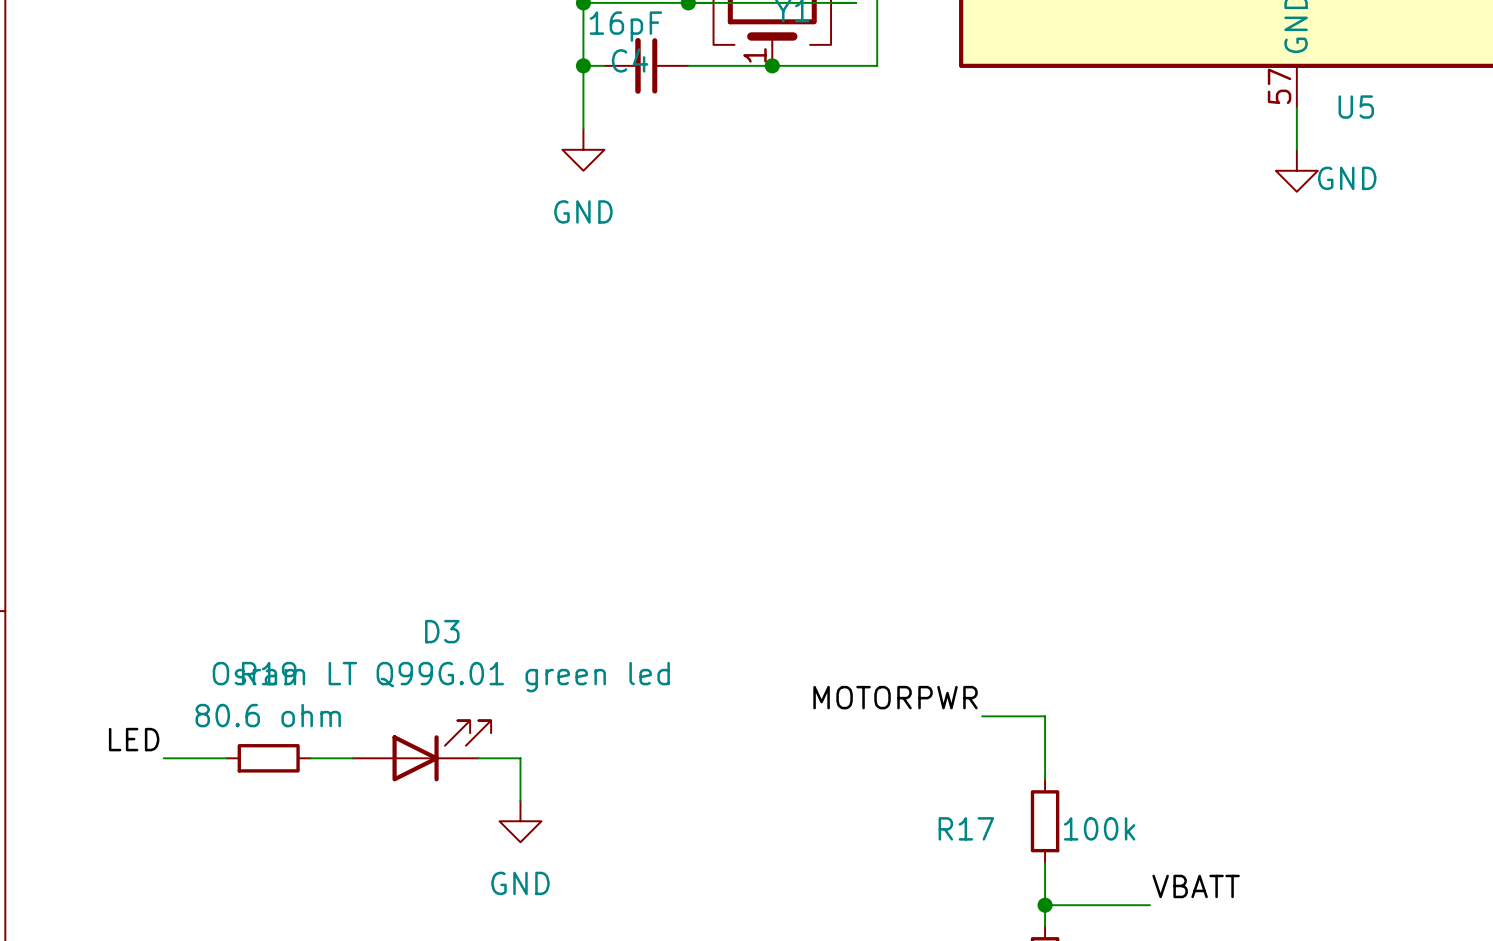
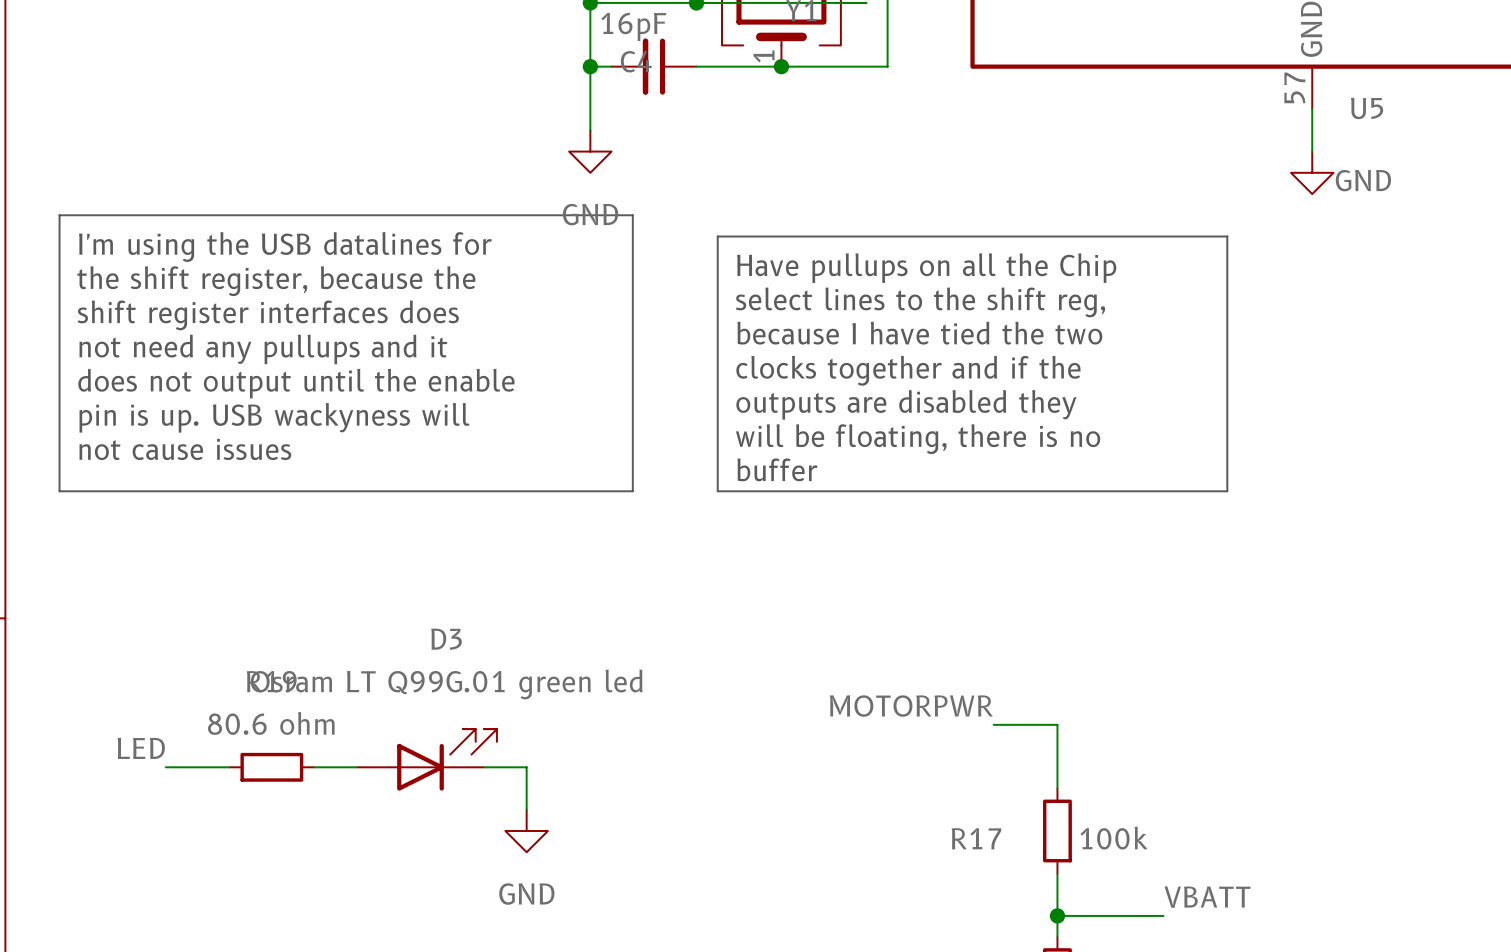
line: none -> (59, 215) (632, 215) (632, 491) (59, 491) (59, 215)
line: none -> (717, 236) (1227, 236) (1227, 491) (717, 491) (717, 236)
text: none -> I'm using the USB datalines for (285, 247)
text: none -> Have pullups on all the Chip (926, 268)
text: none -> the shift register, because the (276, 281)
text: none -> select lines to the shift reg, (920, 302)
text: none -> shift register interfaces does (268, 315)
text: none -> because I have tied the two (919, 333)
text: none -> not need any pullups and it (263, 349)
text: none -> clocks together and if the (908, 370)
text: none -> does not output until the enable (296, 383)
text: none -> outputs are disabled they (906, 404)
text: none -> pin is up. USB wackyness will (274, 417)
text: none -> will be floating, there is no (918, 439)
text: none -> not cause issues (185, 449)
text: none -> buffer (777, 469)

